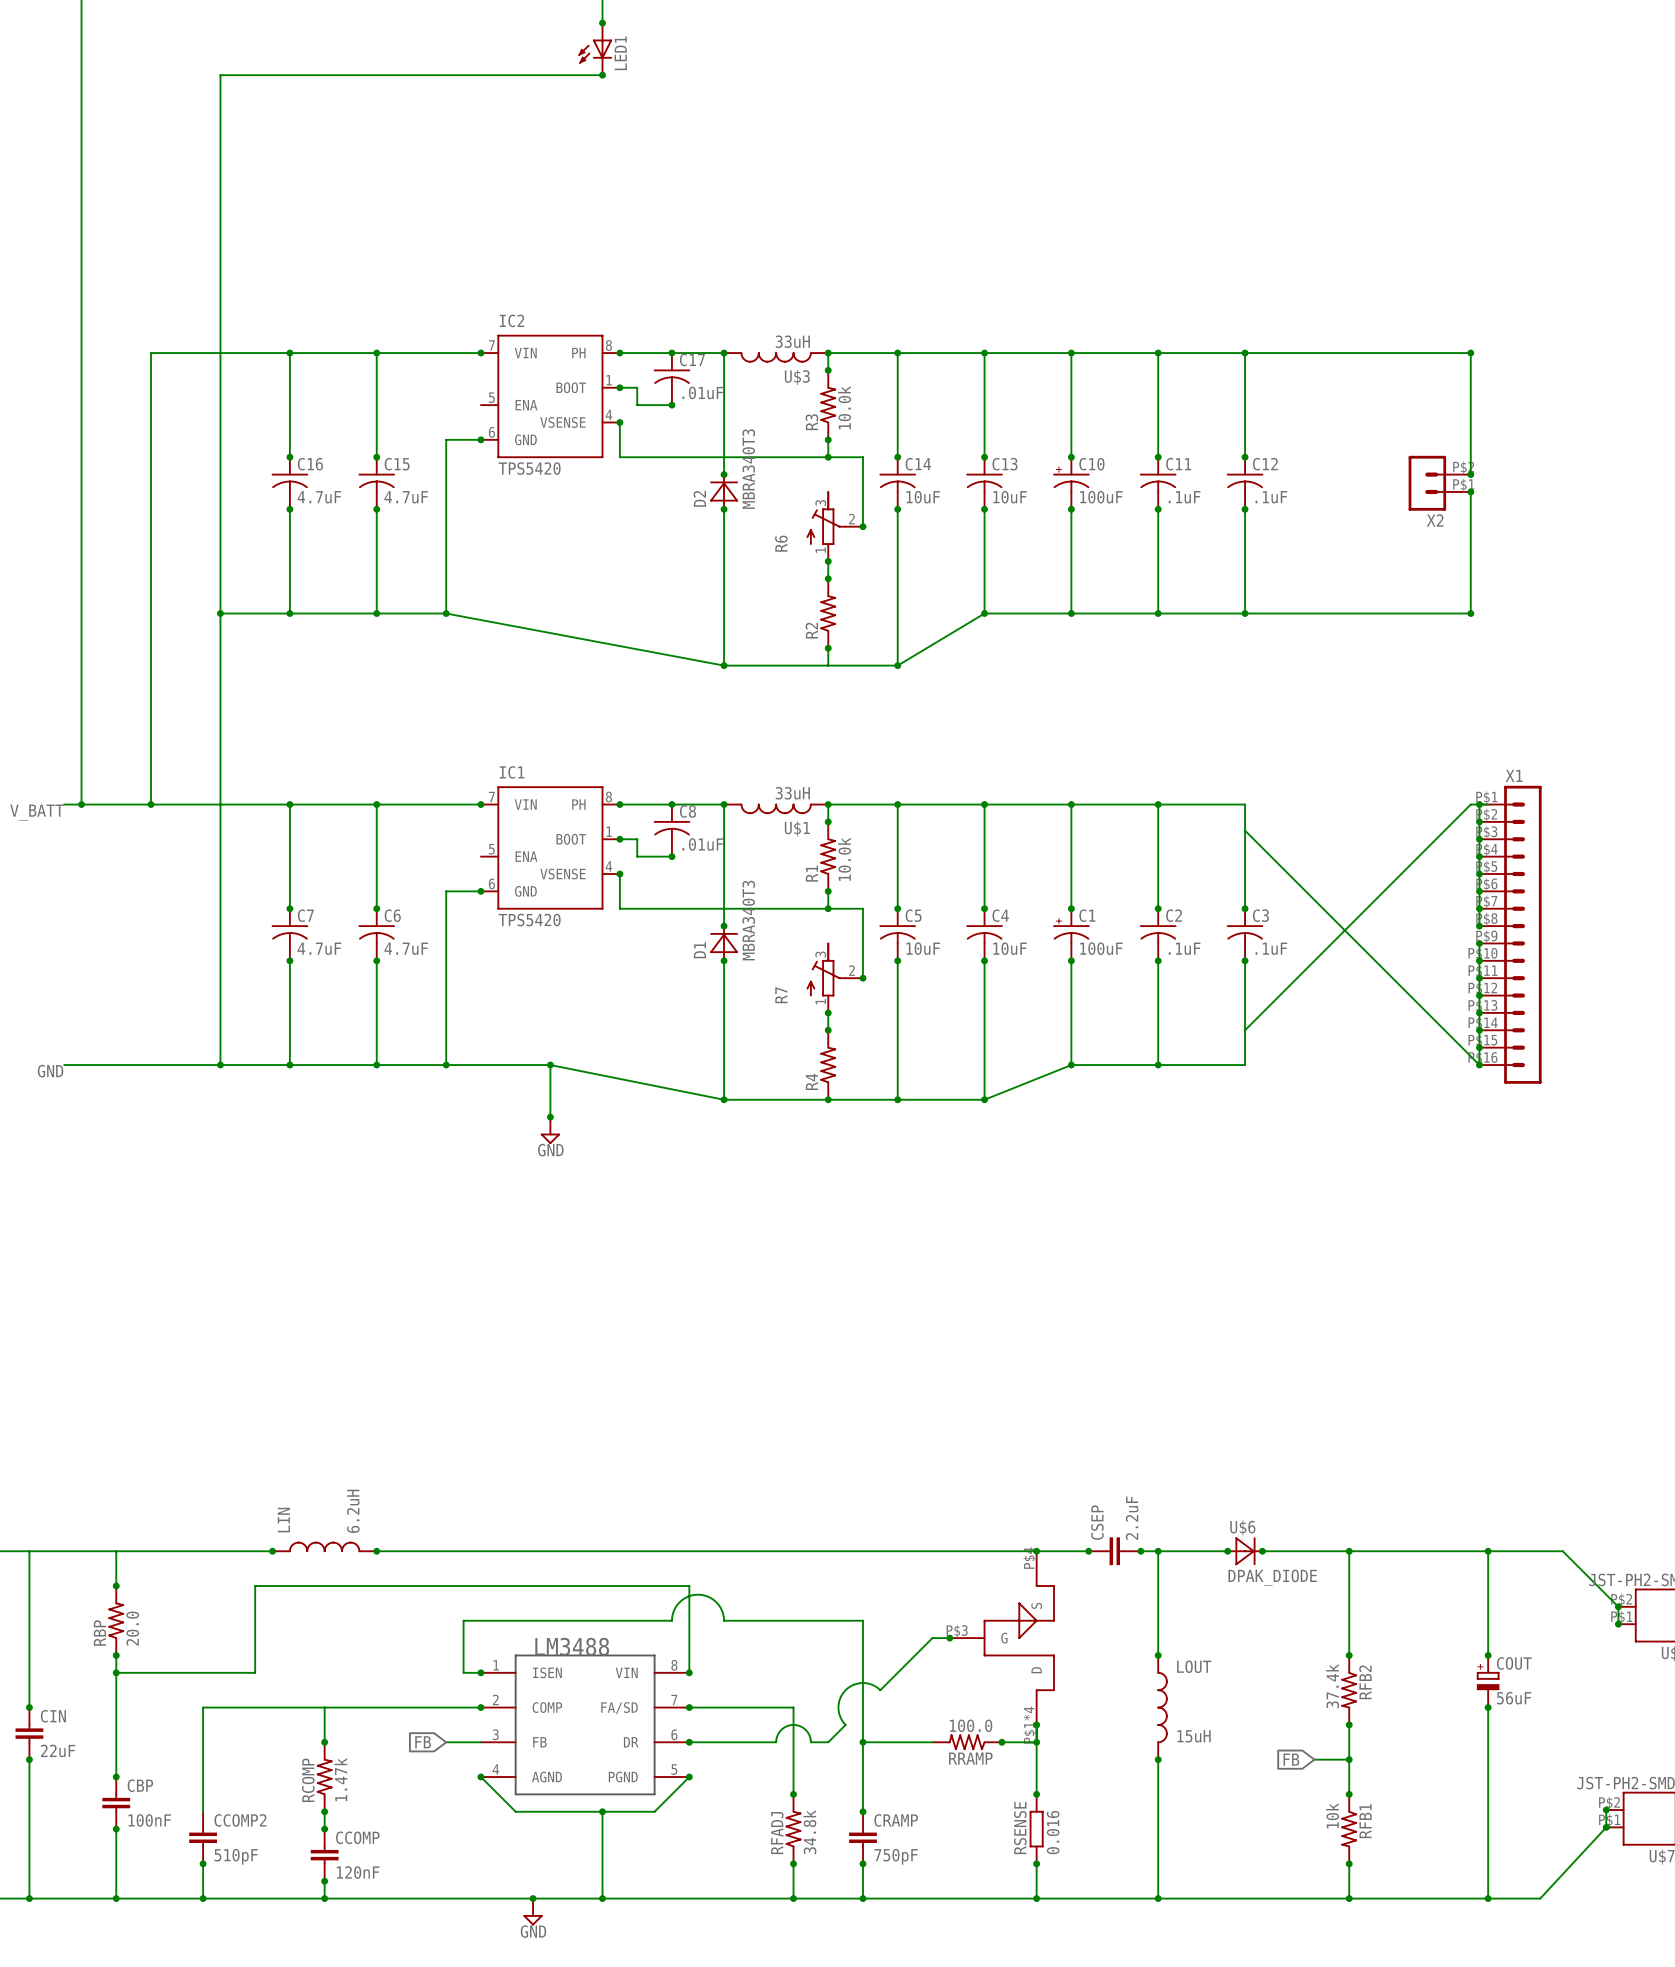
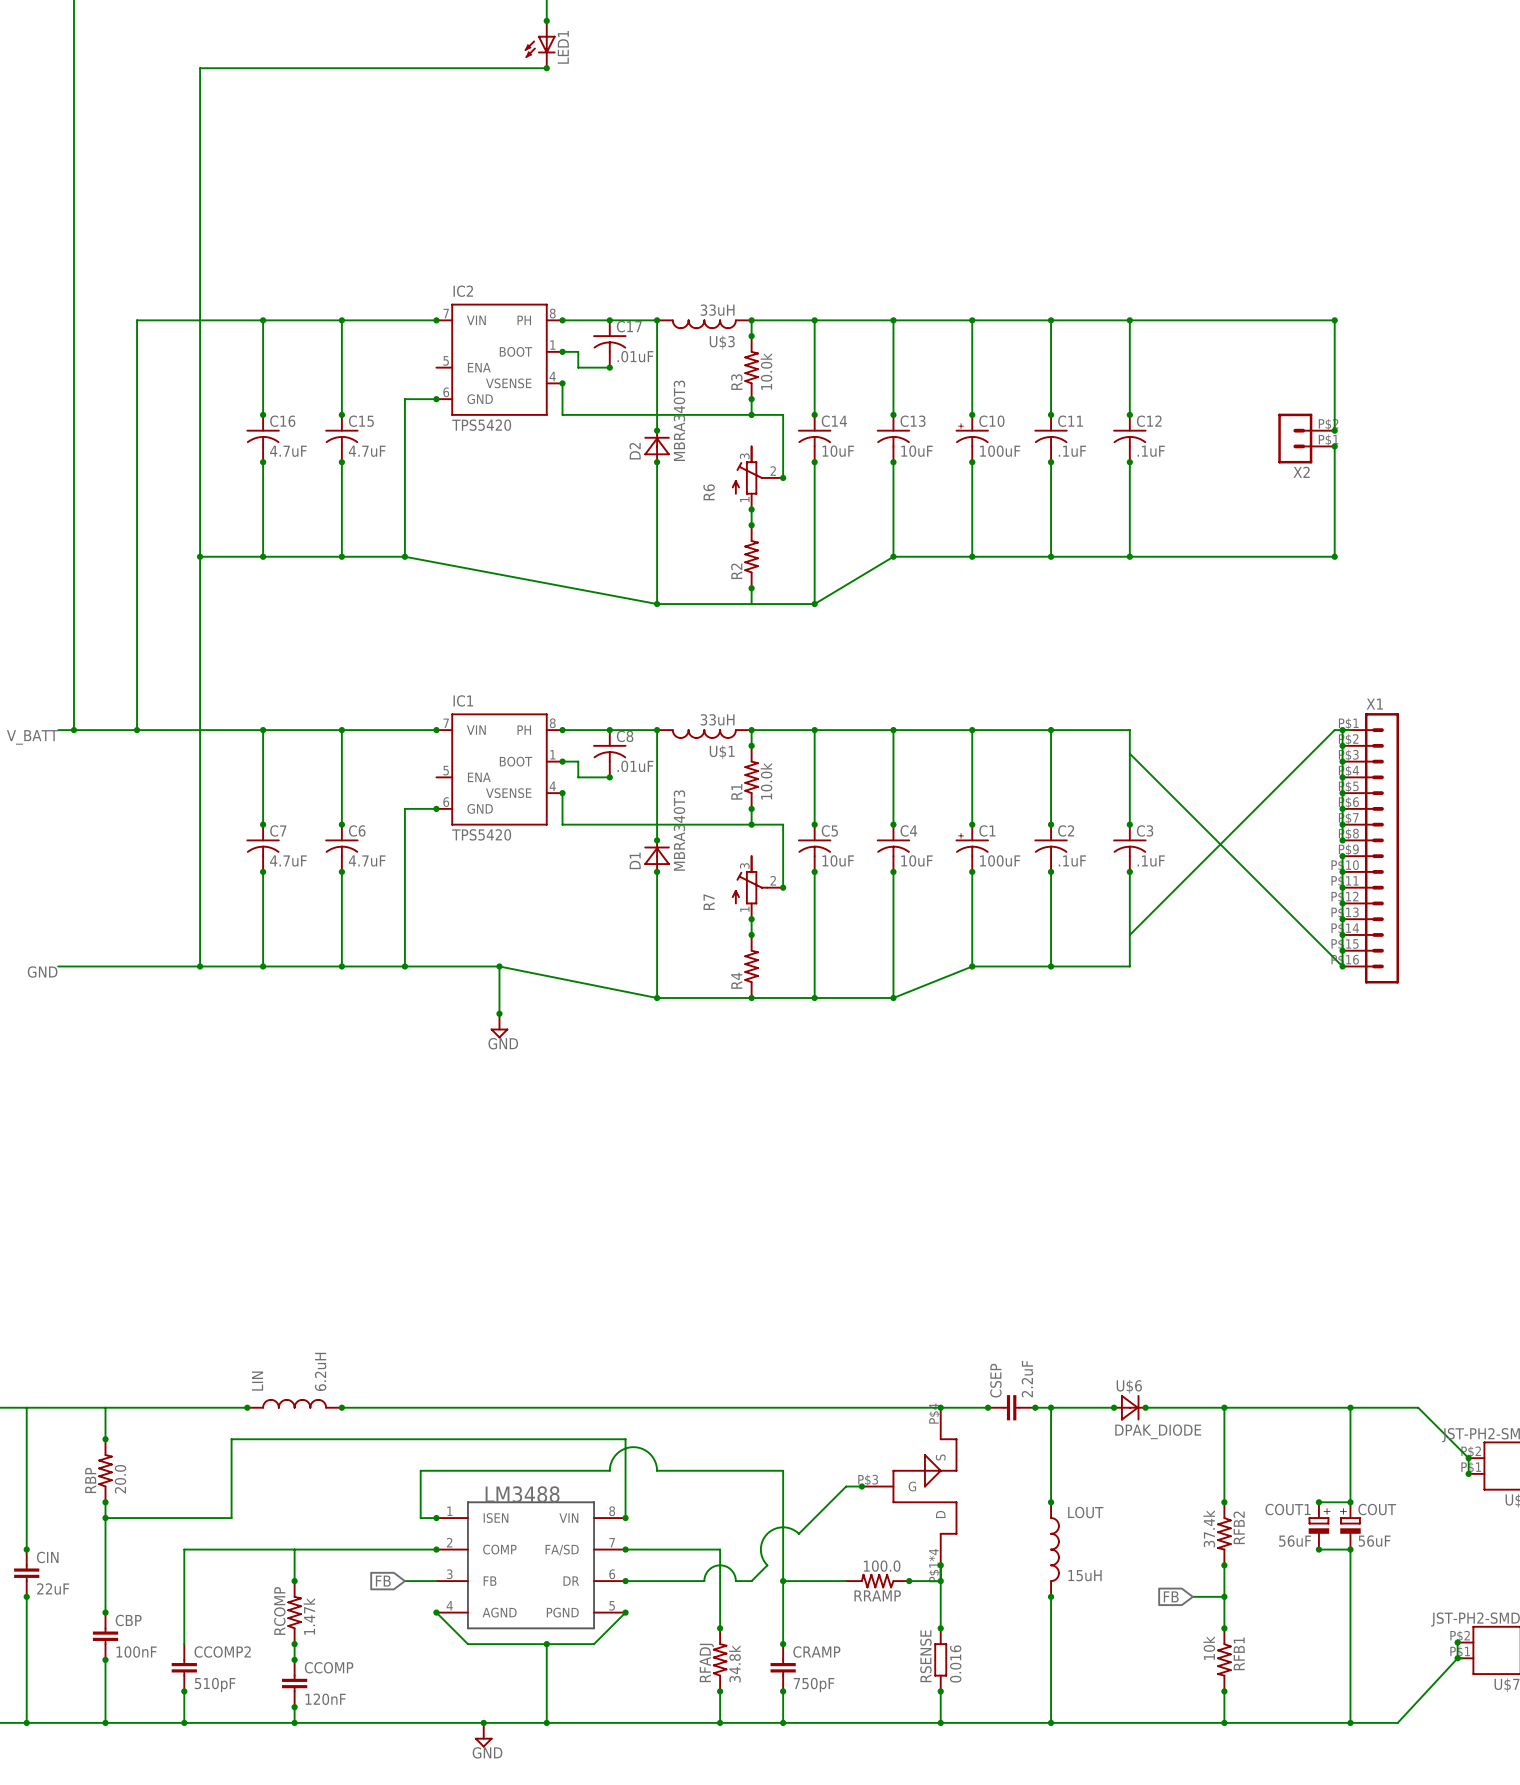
wire: none -> (1318, 1502) (1350, 1502)
junction: none -> (1318, 1502)
COUT1: none -> 56uF (1318, 1525)
wire: none -> (1318, 1549) (1350, 1549)
junction: none -> (1318, 1549)

